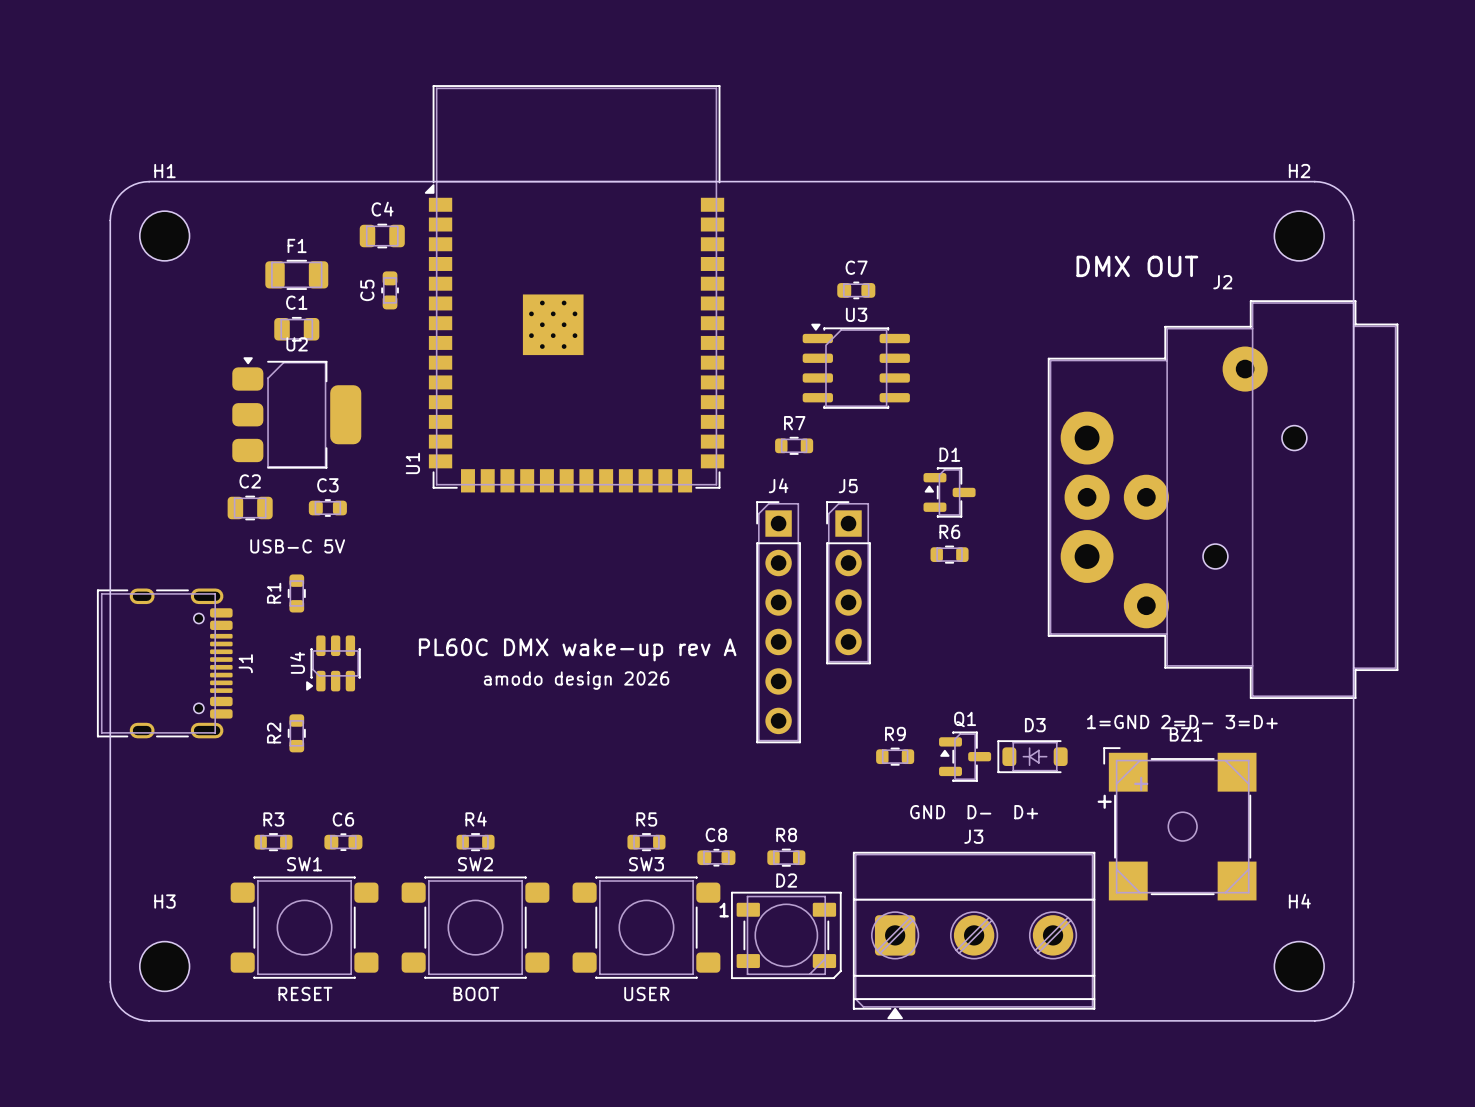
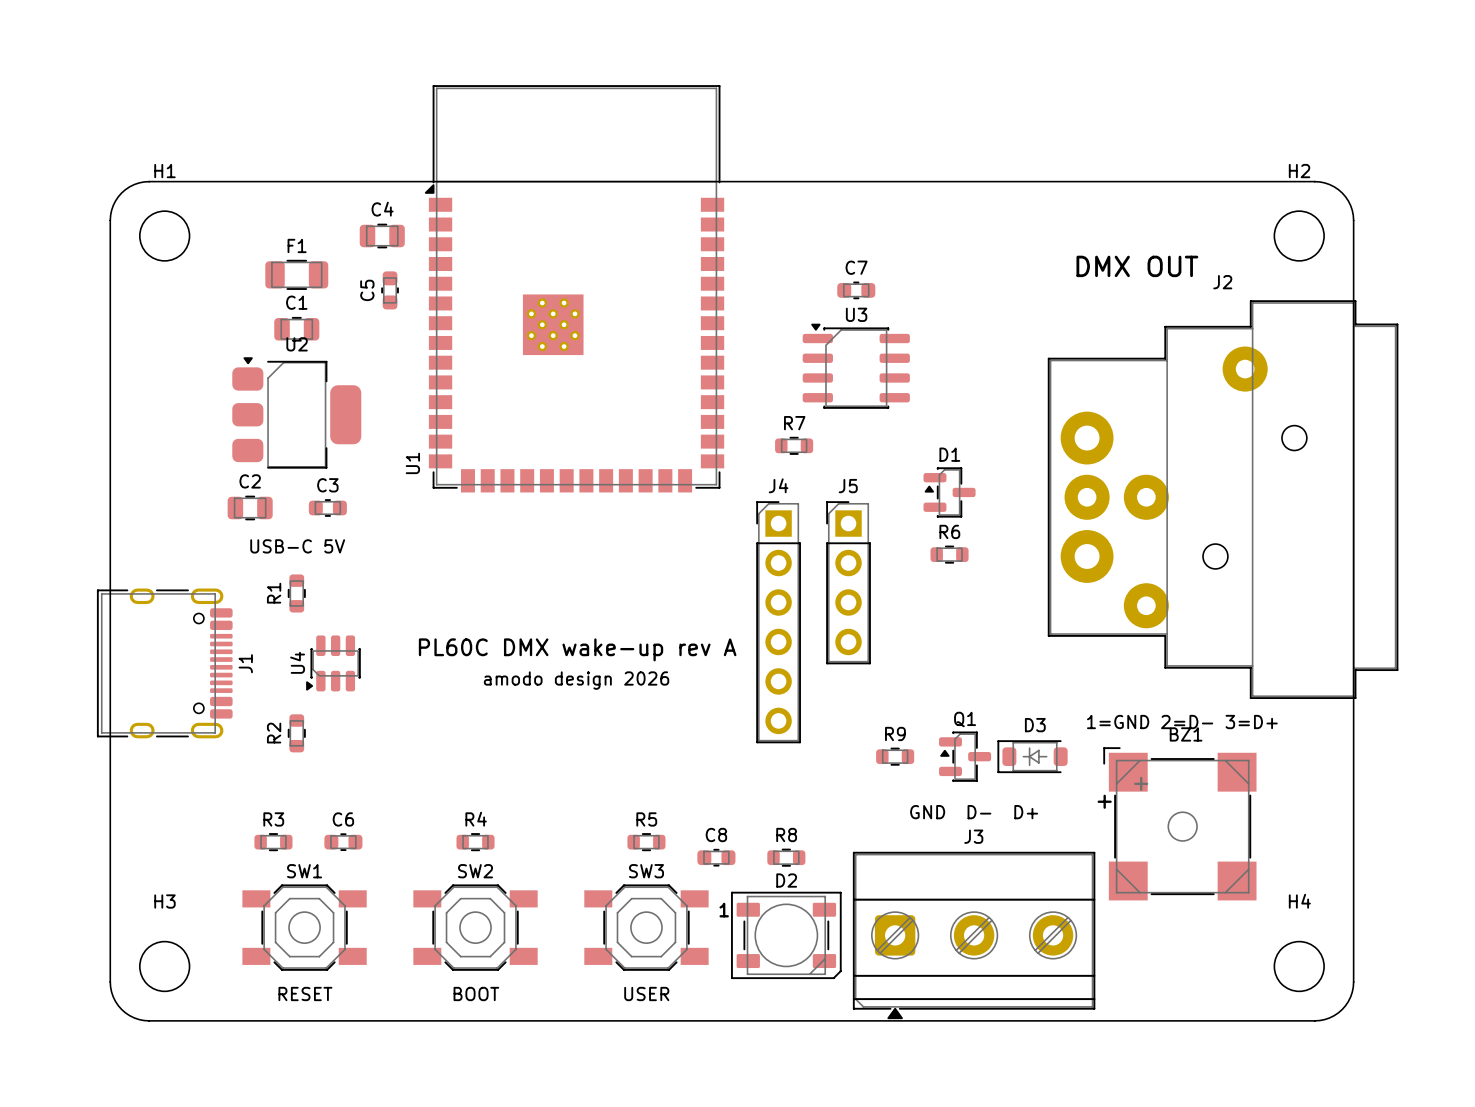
SW1 footprint: [230, 876, 379, 979] -> [242, 884, 367, 971]
SW2 footprint: [401, 876, 550, 979] -> [413, 884, 538, 971]
SW3 footprint: [572, 876, 721, 979] -> [584, 884, 709, 971]

